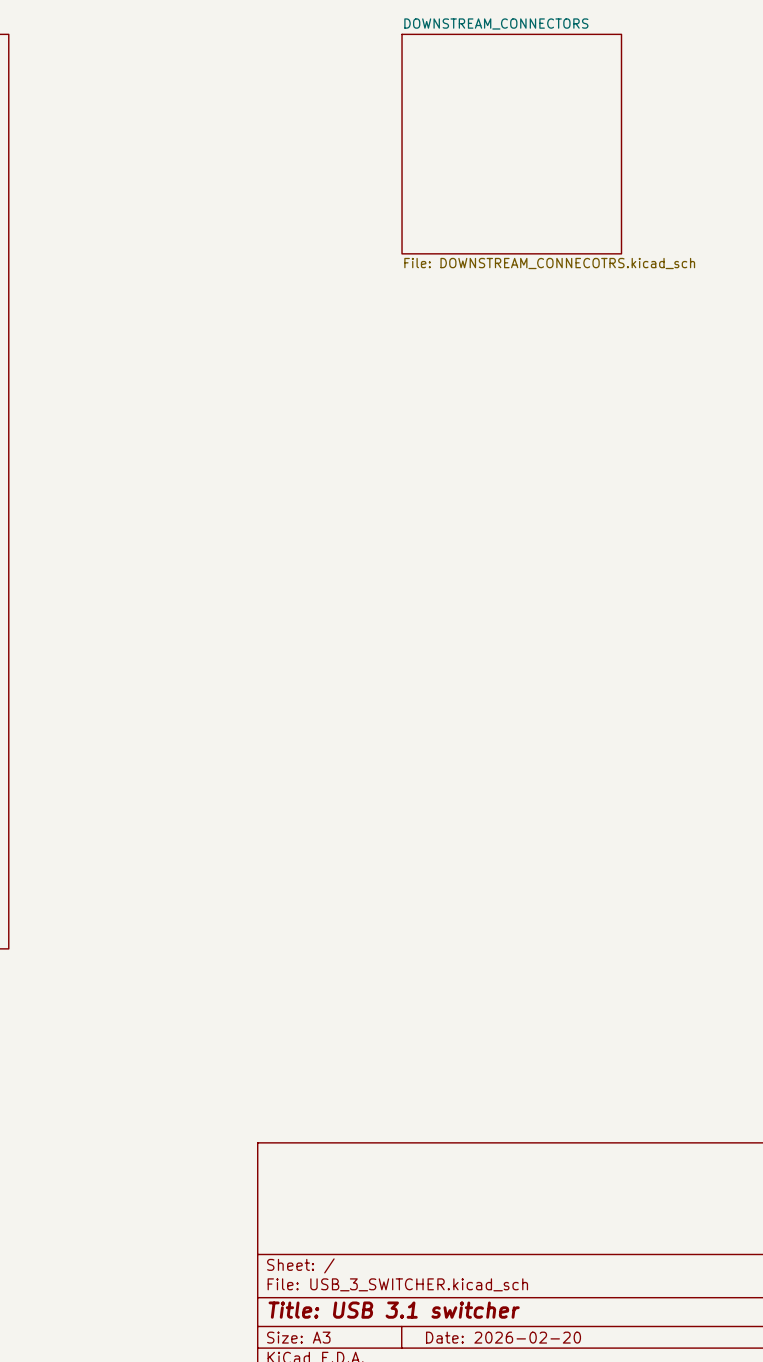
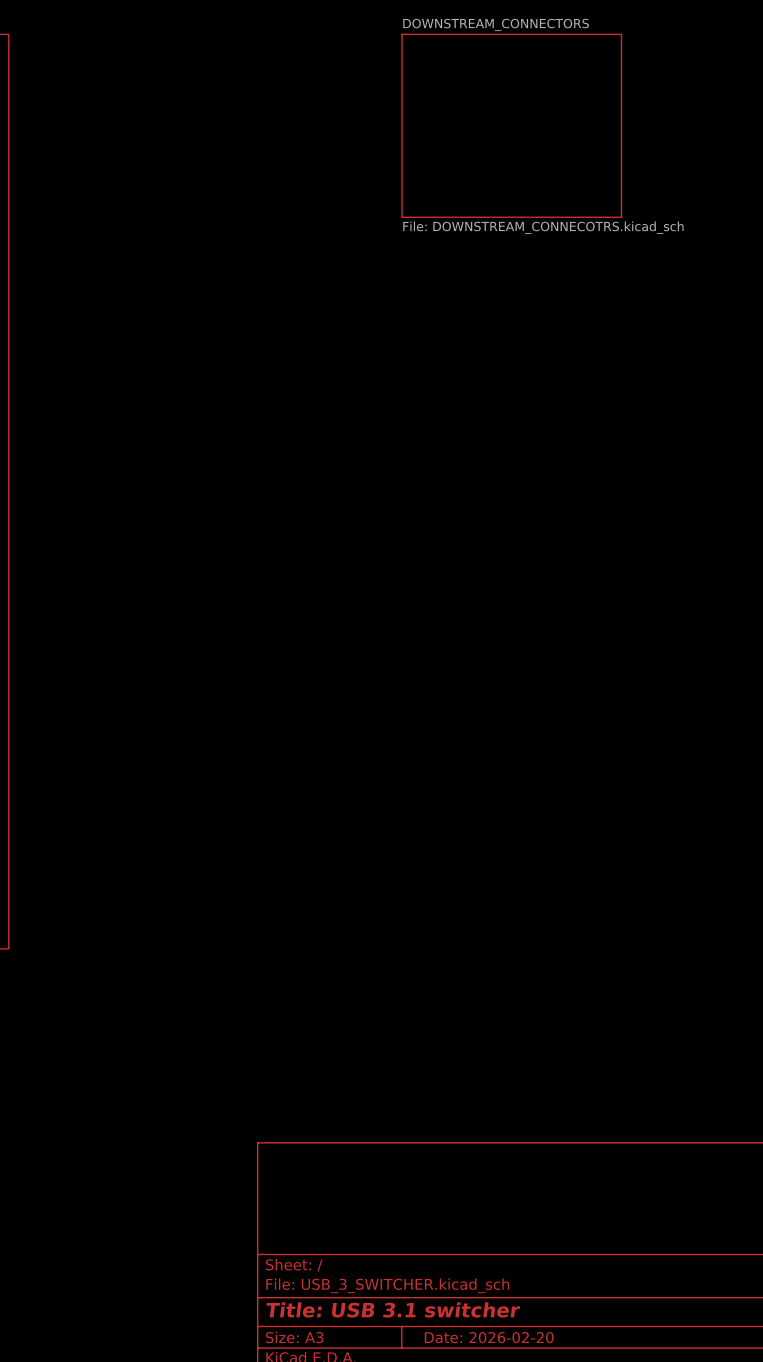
sheet DOWNSTREAM_CONNECTORS: none -> File: DOWNSTREAM_CONNECOTRS.kicad_sch (511, 125)
sheet DOWNSTREAM_CONNECTORS: File: DOWNSTREAM_CONNECOTRS.kicad_sch (511, 144) -> none

